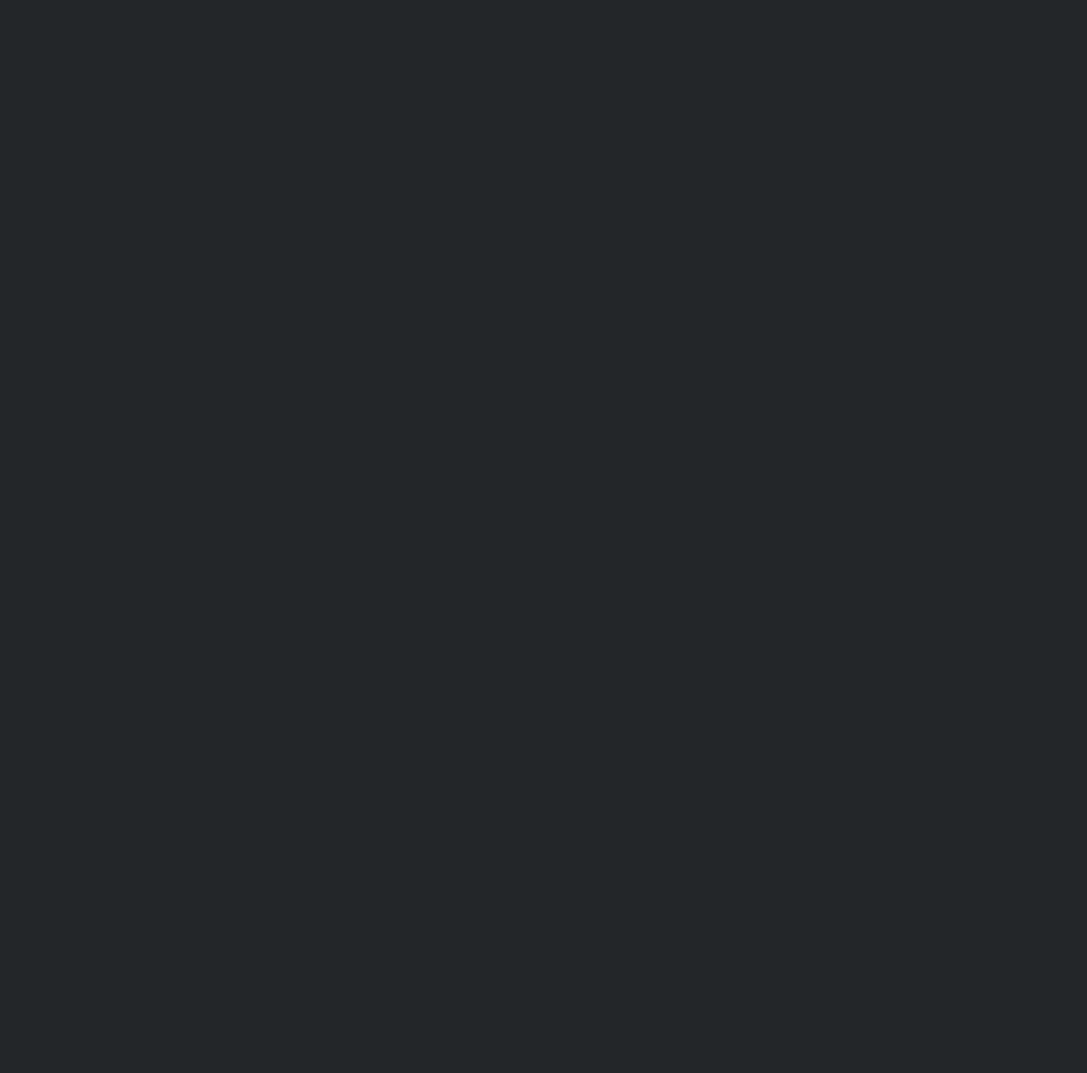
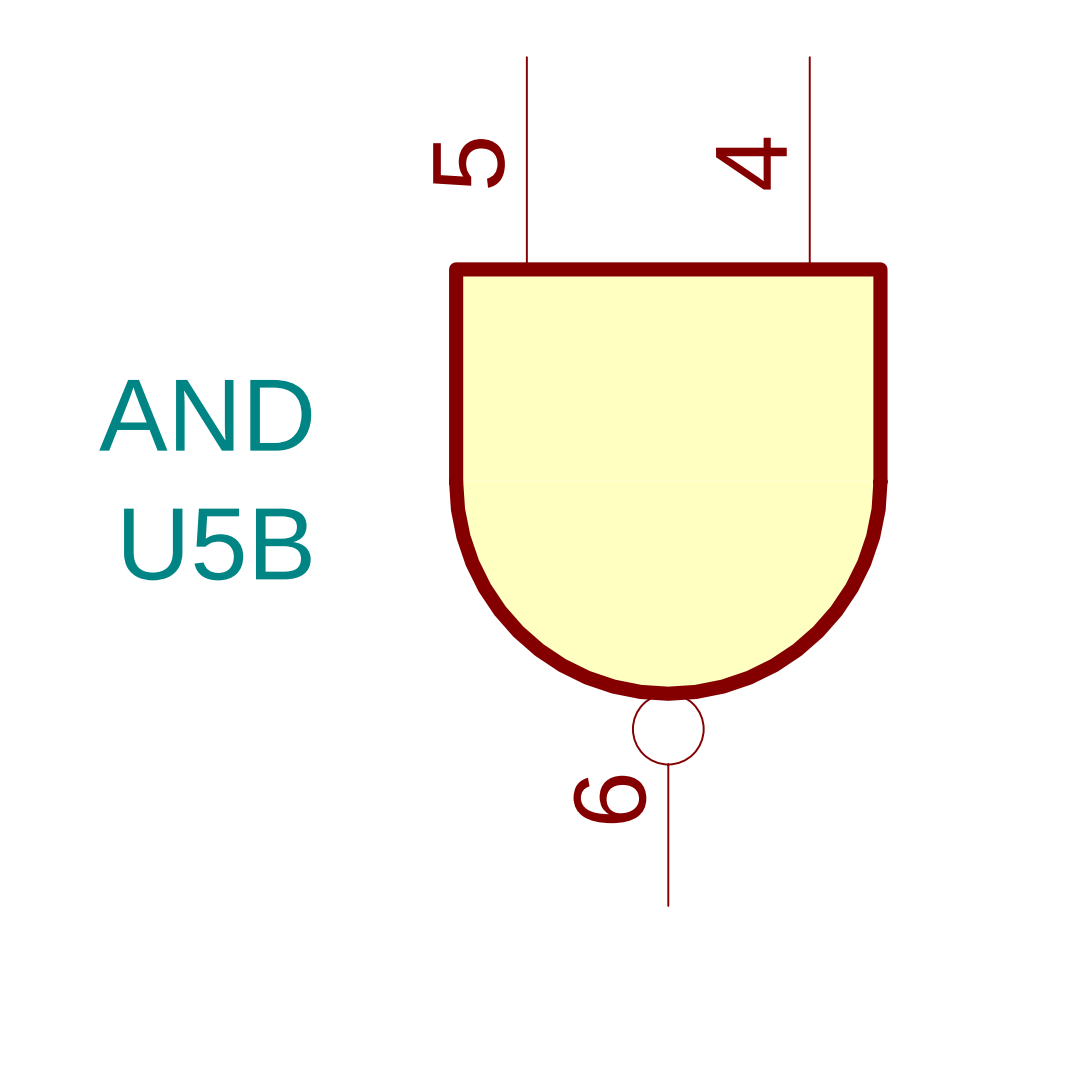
U5B: none -> AND (668, 481)

